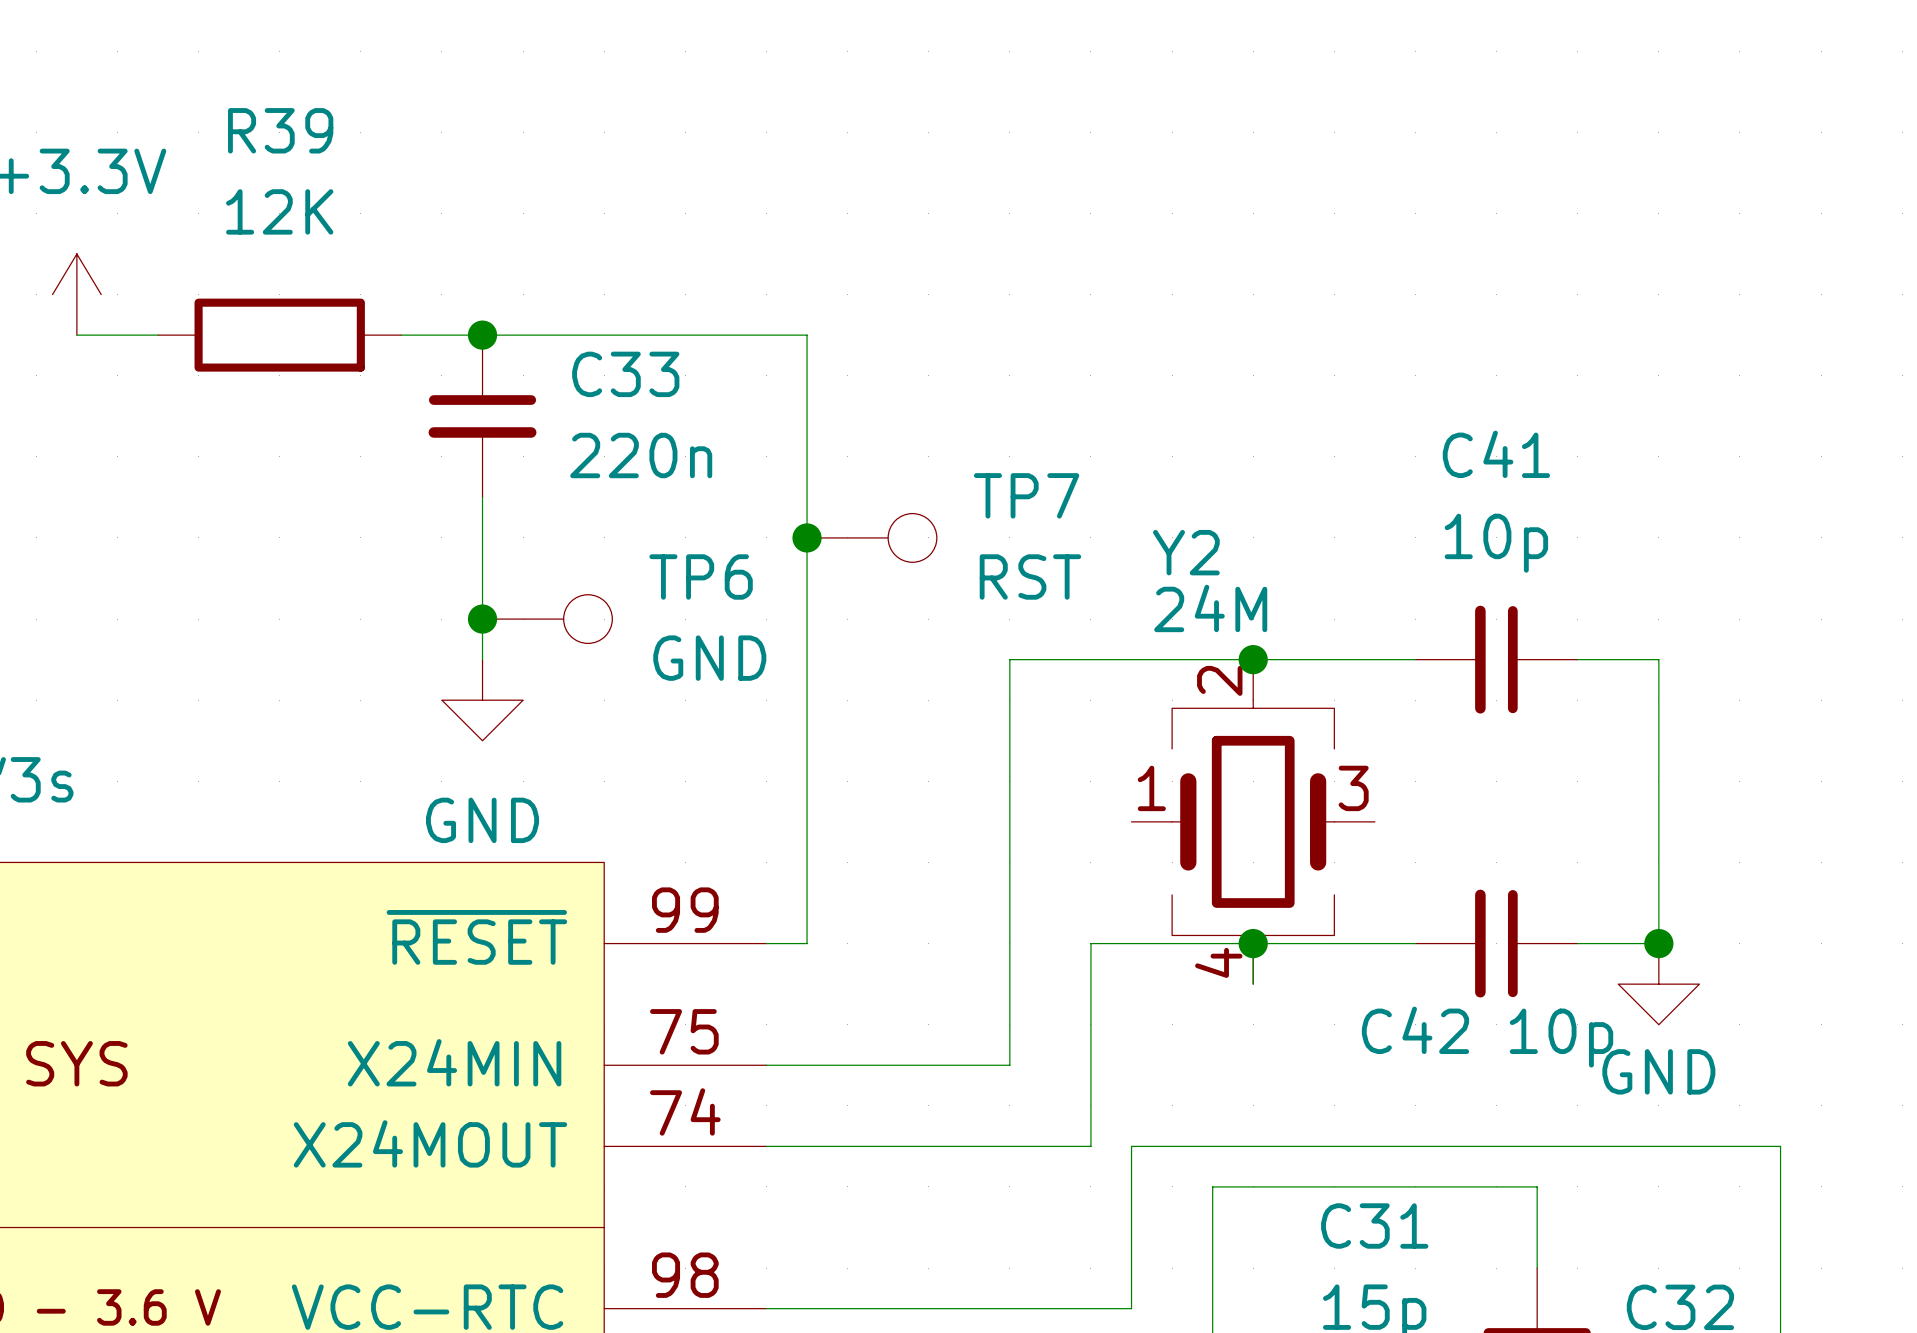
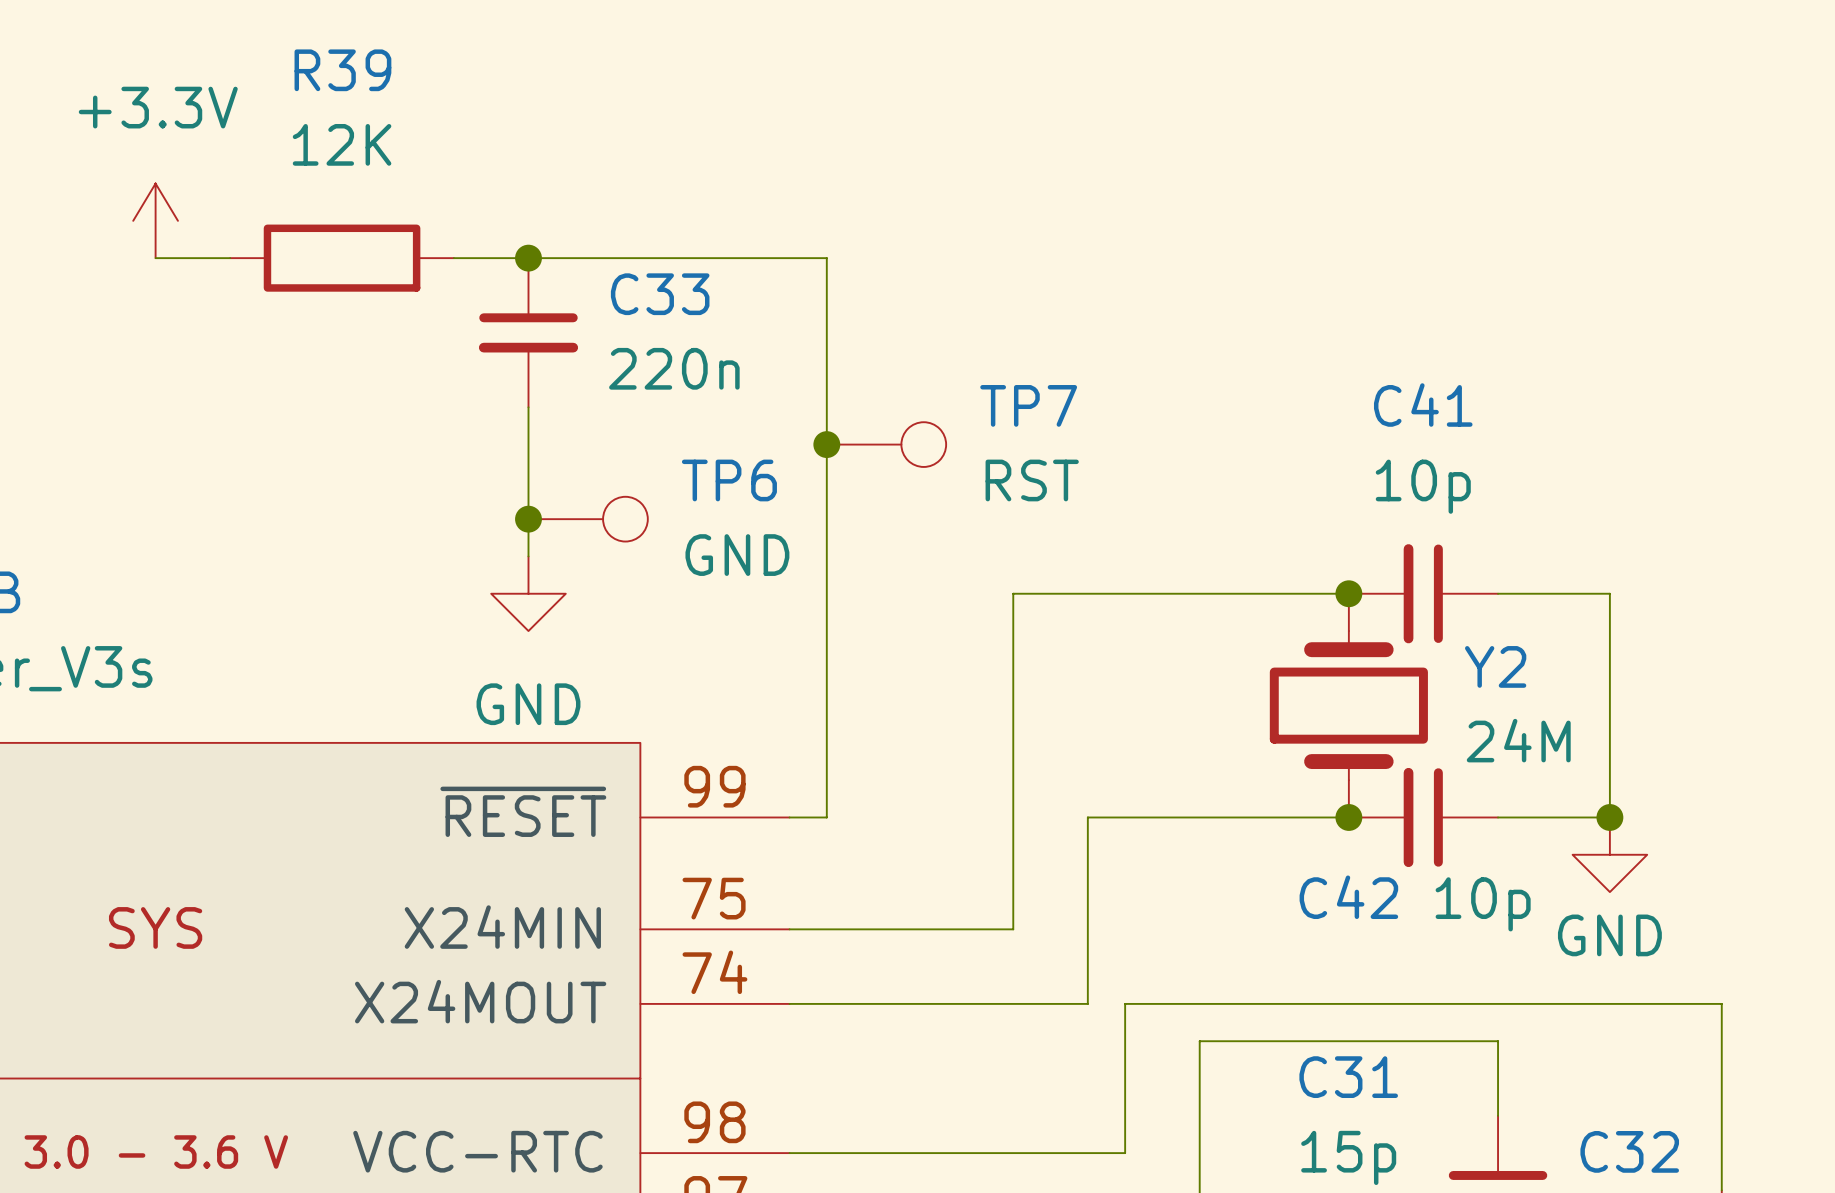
Y2 name position: Y2 (1186, 552) -> Y2 (1495, 666)
Y2 value position: 24M (1210, 608) -> 24M (1518, 740)
Y2 symbol: [1131, 659, 1375, 985] -> [1269, 593, 1428, 818]
junction position: (1253, 659) -> (1348, 593)
wire: (1415, 659) (1009, 659) (1009, 700) -> (1348, 593) (1013, 593)
C41 position: (1496, 659) -> (1423, 593)
wire: (1577, 659) (1658, 659) (1658, 700) -> (1498, 593) (1609, 593)
wire: (1253, 943) (1253, 984) -> none
junction position: (1253, 943) -> (1348, 817)
C42 position: (1496, 943) -> (1423, 817)

